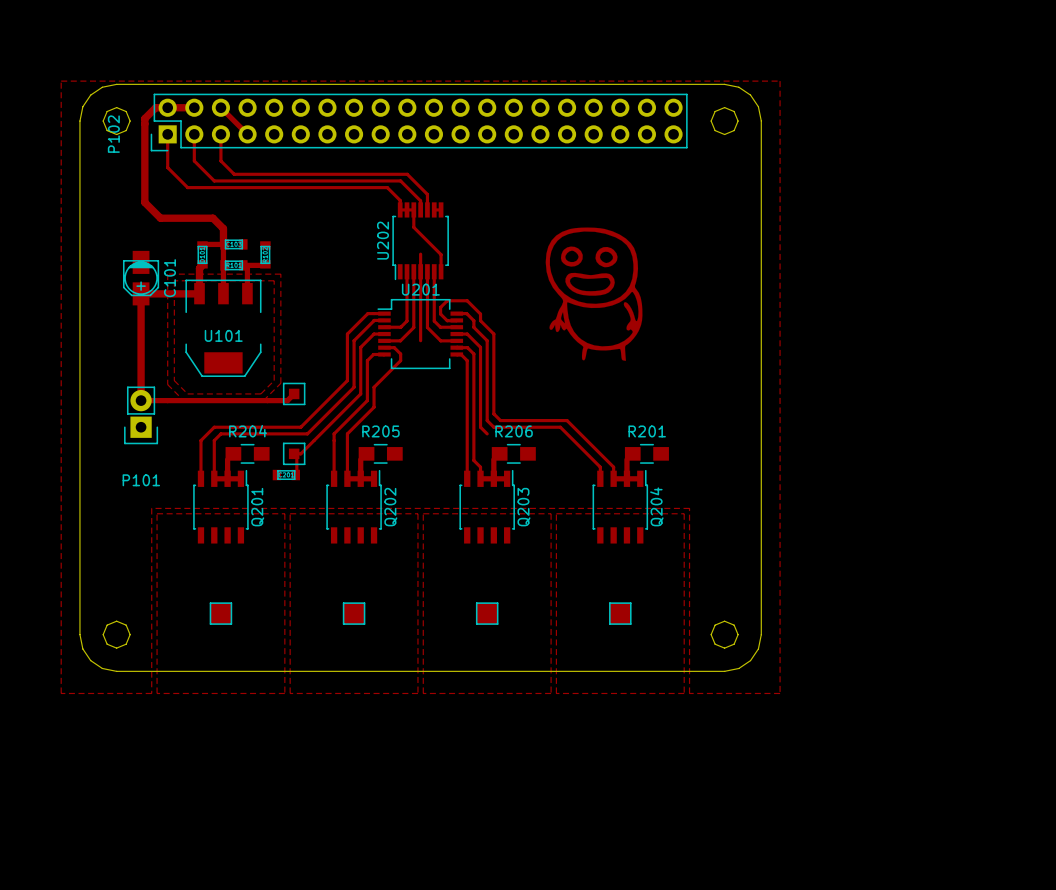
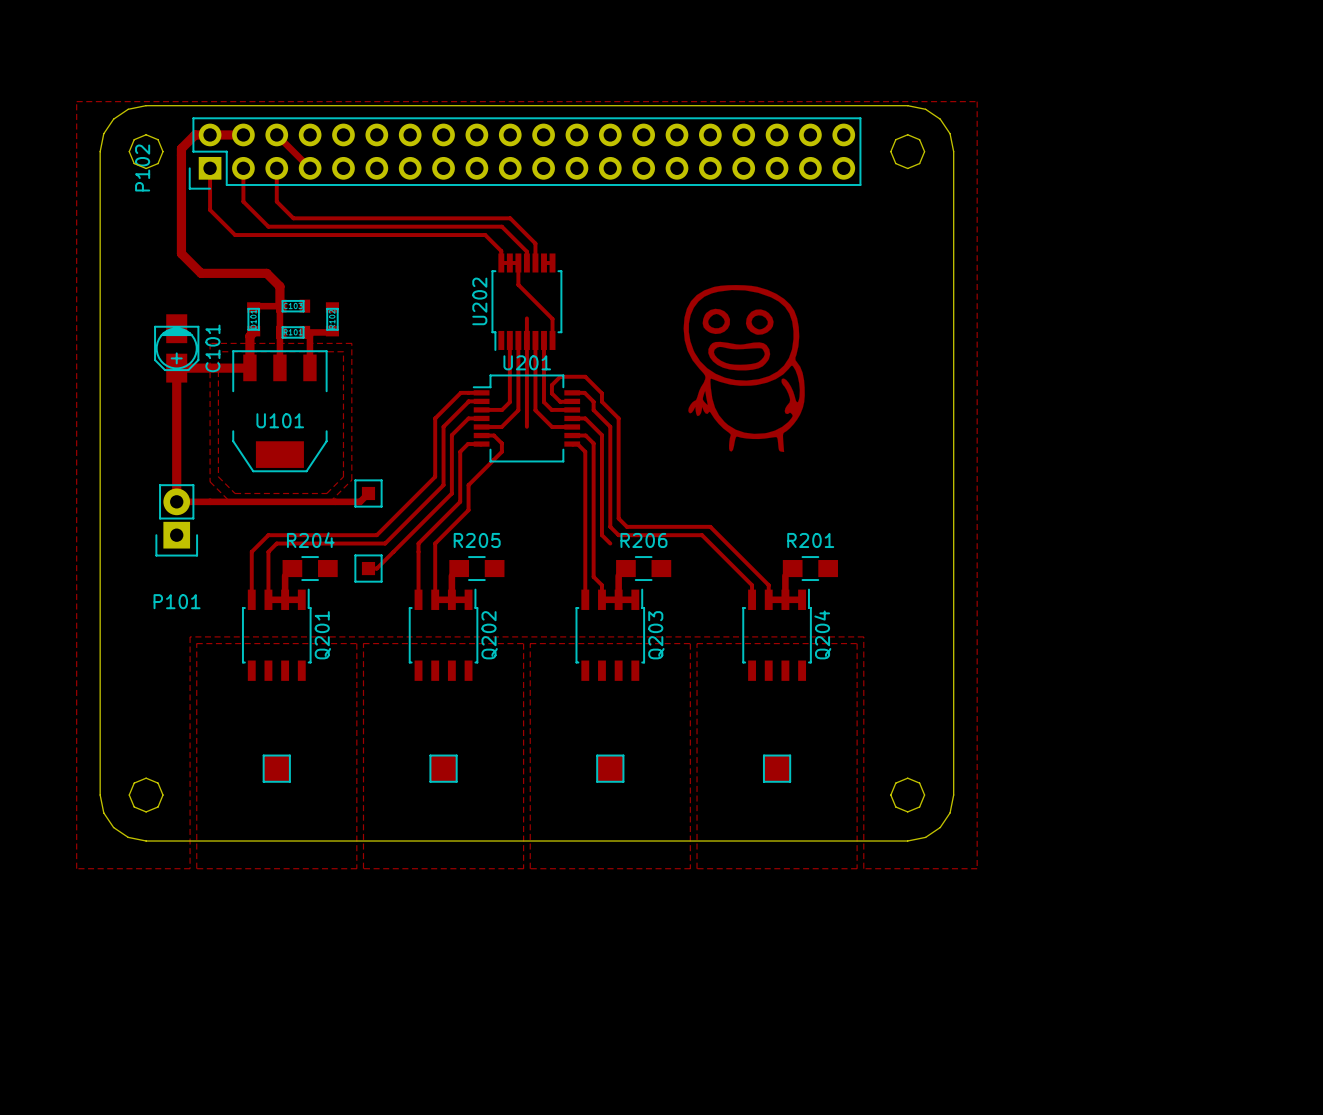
track: (294, 453) (296, 456) (296, 475) -> none
part: (286, 475) -> none

